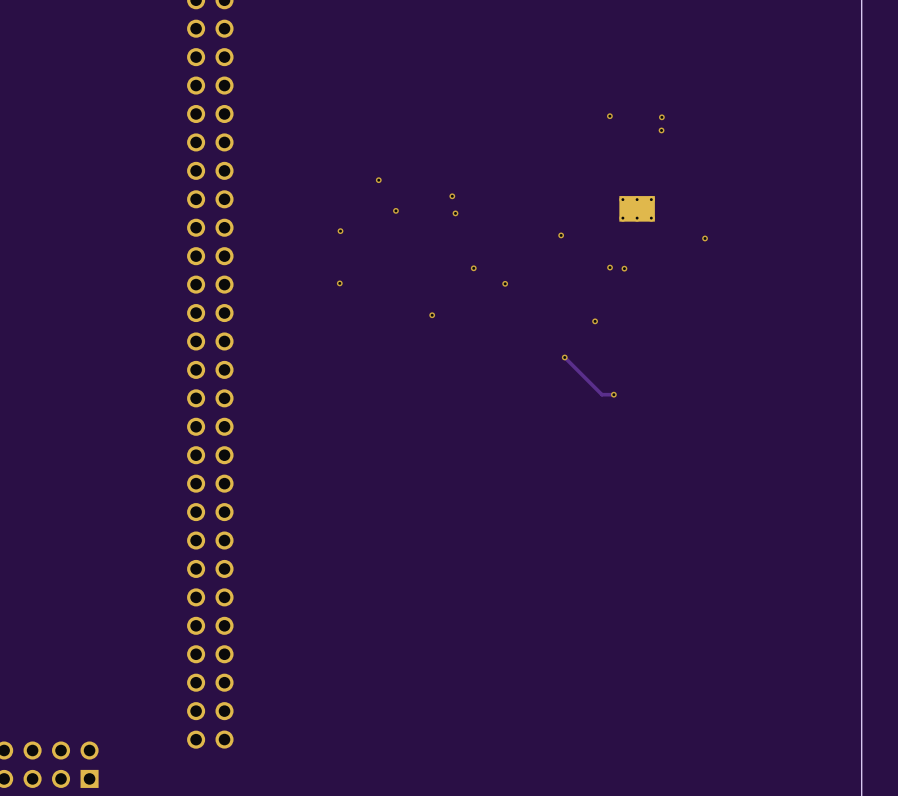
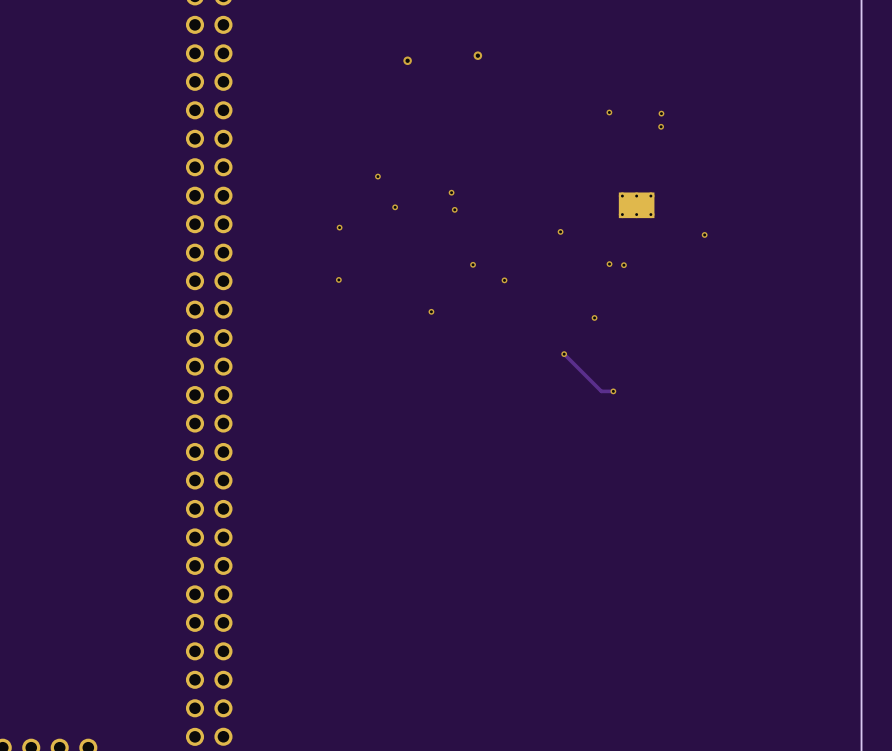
via: none -> (477, 55)
via: none -> (407, 60)

